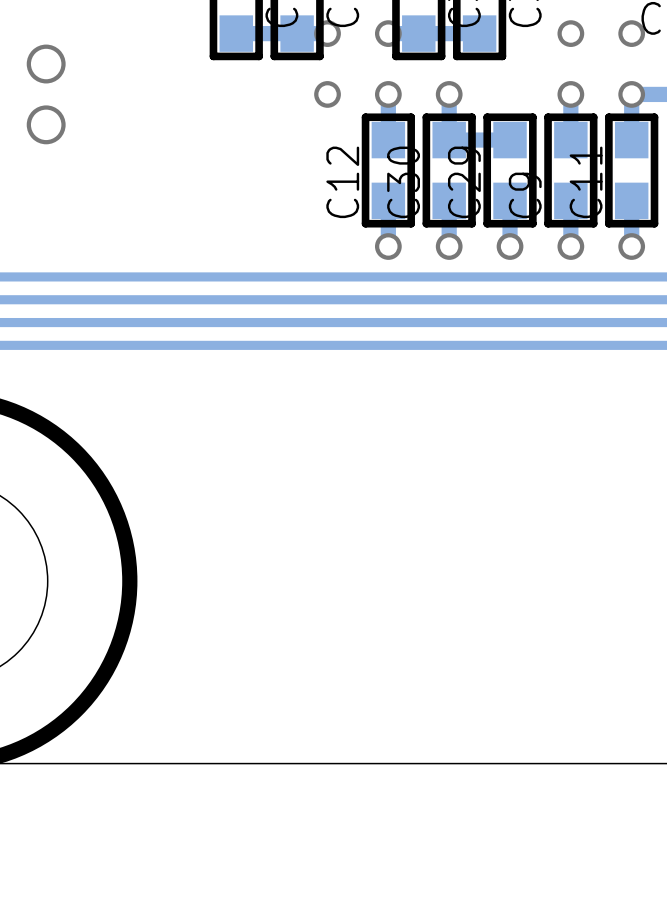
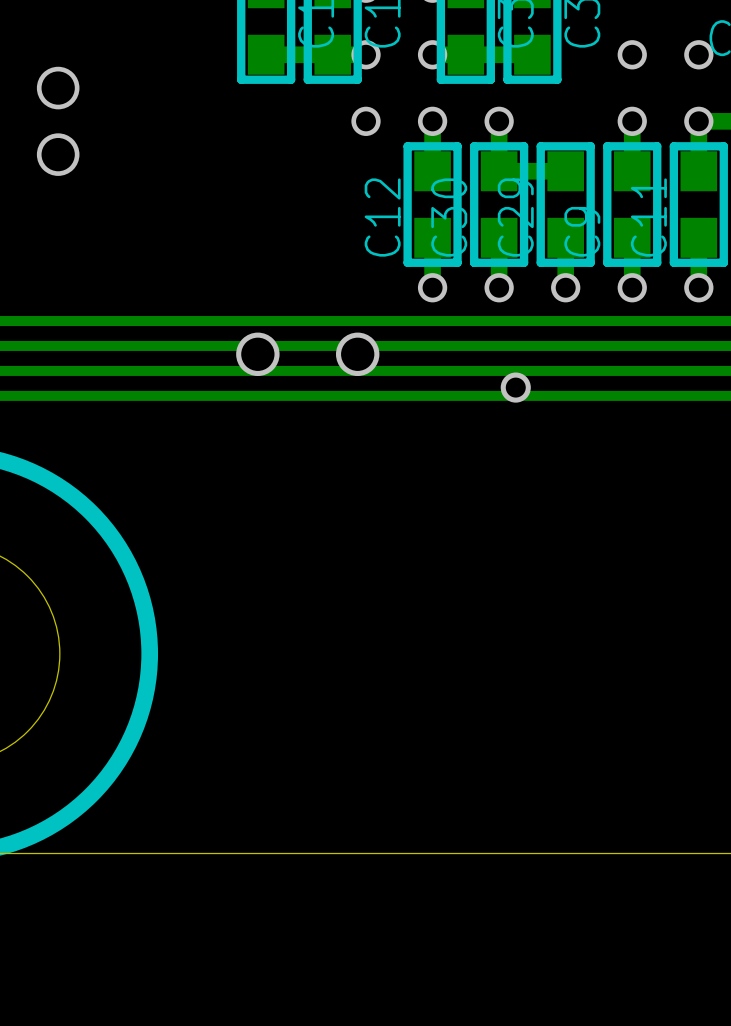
via: none -> (257, 354)
via: none -> (357, 354)
via: none -> (515, 387)

